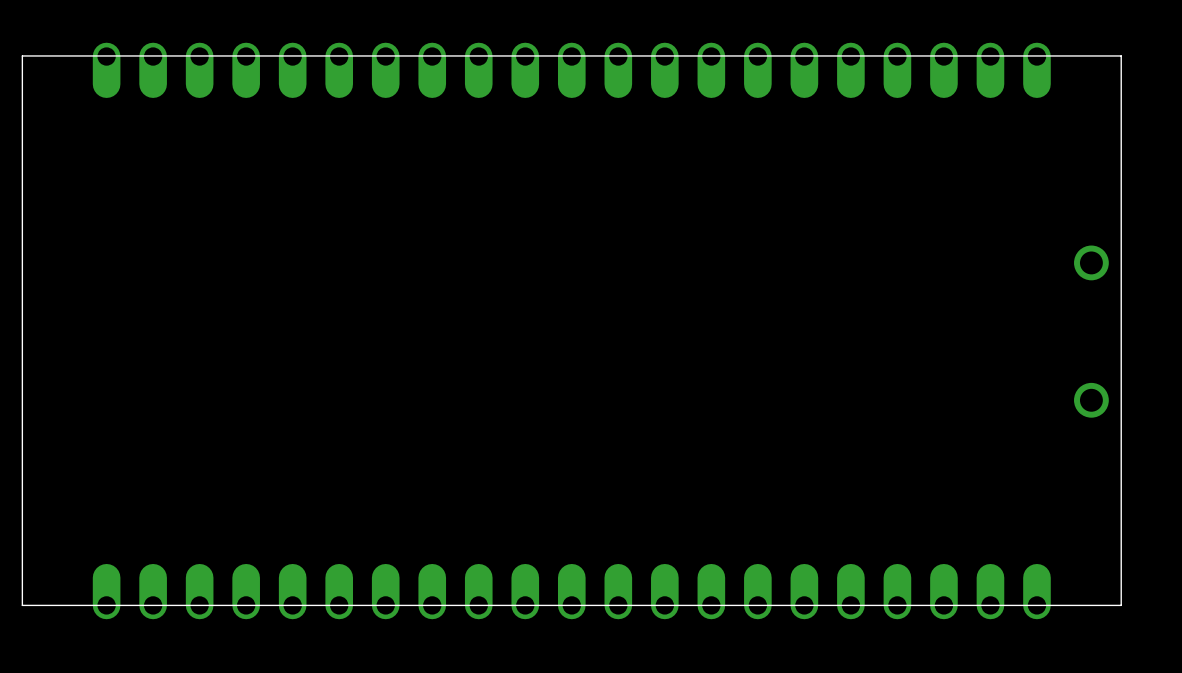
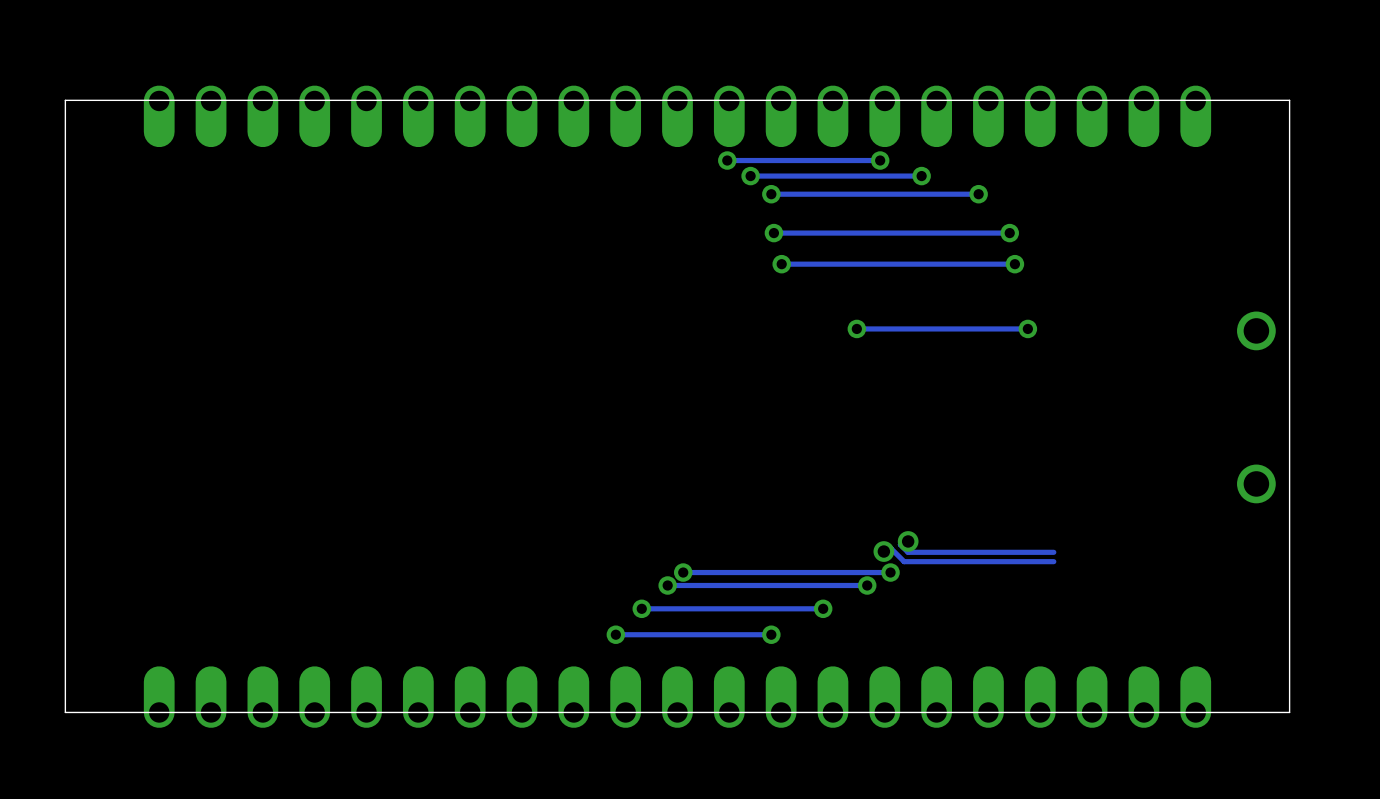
via: none -> (727, 160)
track: none -> (880, 160) (727, 160)
via: none -> (880, 160)
via: none -> (750, 176)
track: none -> (921, 176) (750, 176)
via: none -> (921, 176)
via: none -> (771, 194)
track: none -> (978, 194) (771, 194)
via: none -> (978, 194)
via: none -> (773, 233)
track: none -> (1009, 233) (773, 233)
via: none -> (1009, 233)
via: none -> (781, 264)
track: none -> (1014, 264) (781, 264)
via: none -> (1014, 264)
via: none -> (856, 328)
track: none -> (1027, 328) (856, 328)
via: none -> (1027, 328)
track: none -> (908, 541) (900, 544) (908, 552) (1053, 552)
via: none -> (908, 541)
track: none -> (883, 551) (891, 548) (904, 561) (1053, 561)
via: none -> (883, 551)
via: none -> (683, 572)
track: none -> (890, 572) (683, 572)
via: none -> (890, 572)
via: none -> (667, 585)
track: none -> (867, 585) (667, 585)
via: none -> (867, 585)
via: none -> (641, 608)
track: none -> (823, 608) (641, 608)
via: none -> (823, 608)
via: none -> (615, 634)
track: none -> (771, 634) (615, 634)
via: none -> (771, 634)

